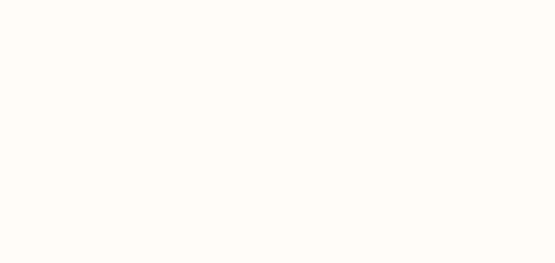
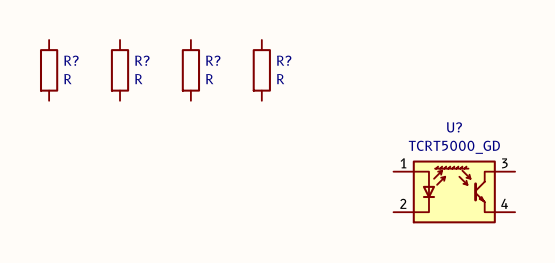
R?: none -> R (49, 70)
R?: none -> R (120, 70)
R?: none -> R (190, 70)
R?: none -> R (261, 70)
U?: none -> TCRT5000_GD (454, 191)

